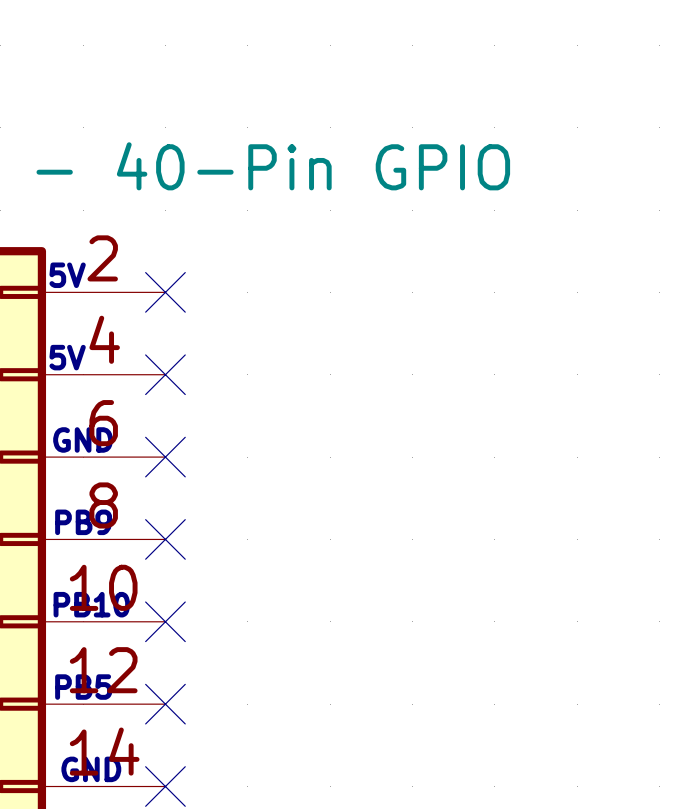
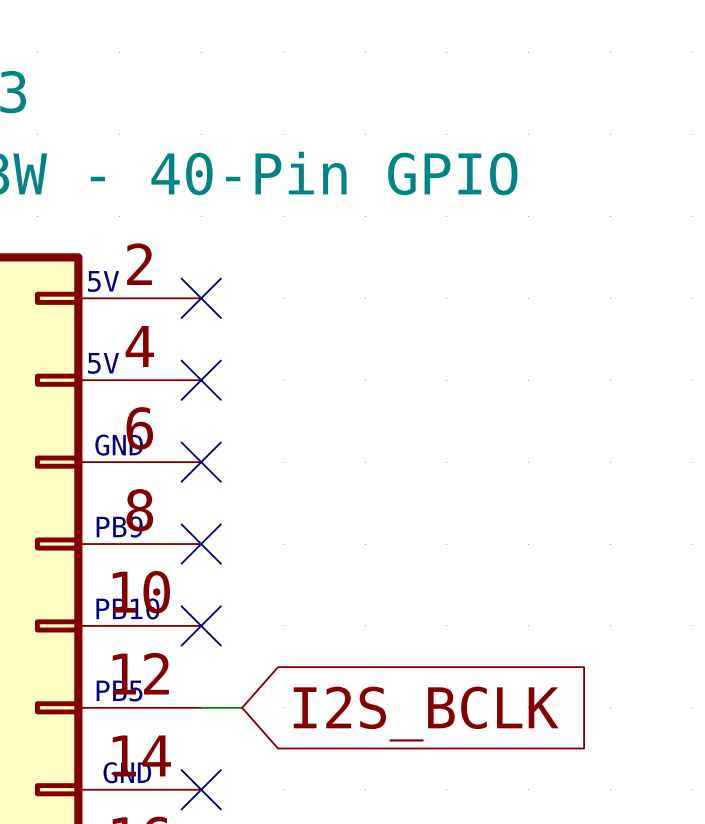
wire: none -> (201, 707) (242, 707)
no-connect mark: (165, 704) -> none
global label: none -> I2S_BCLK (426, 714)

